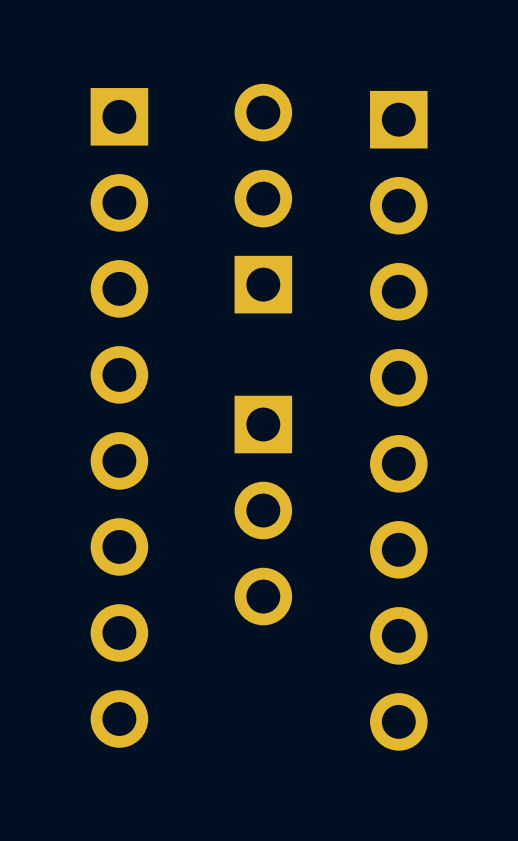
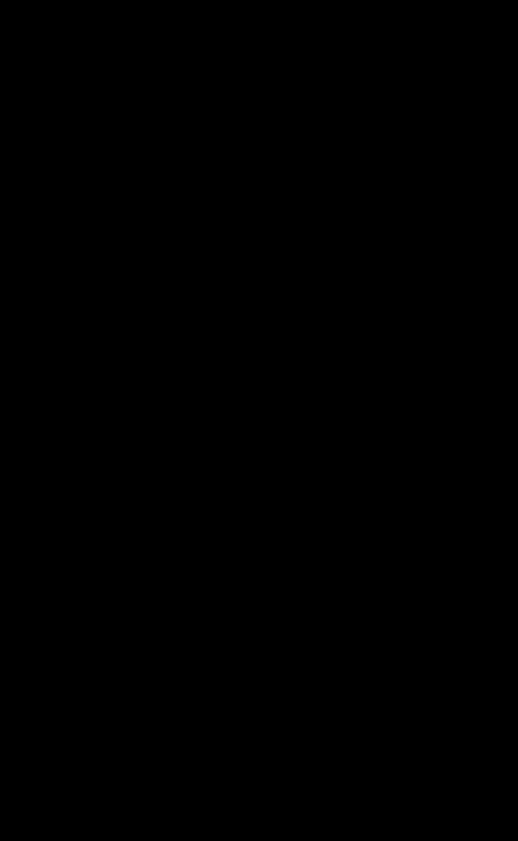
part: (263, 198) -> none
part: (119, 417) -> none
part: (398, 420) -> none
part: (263, 510) -> none

